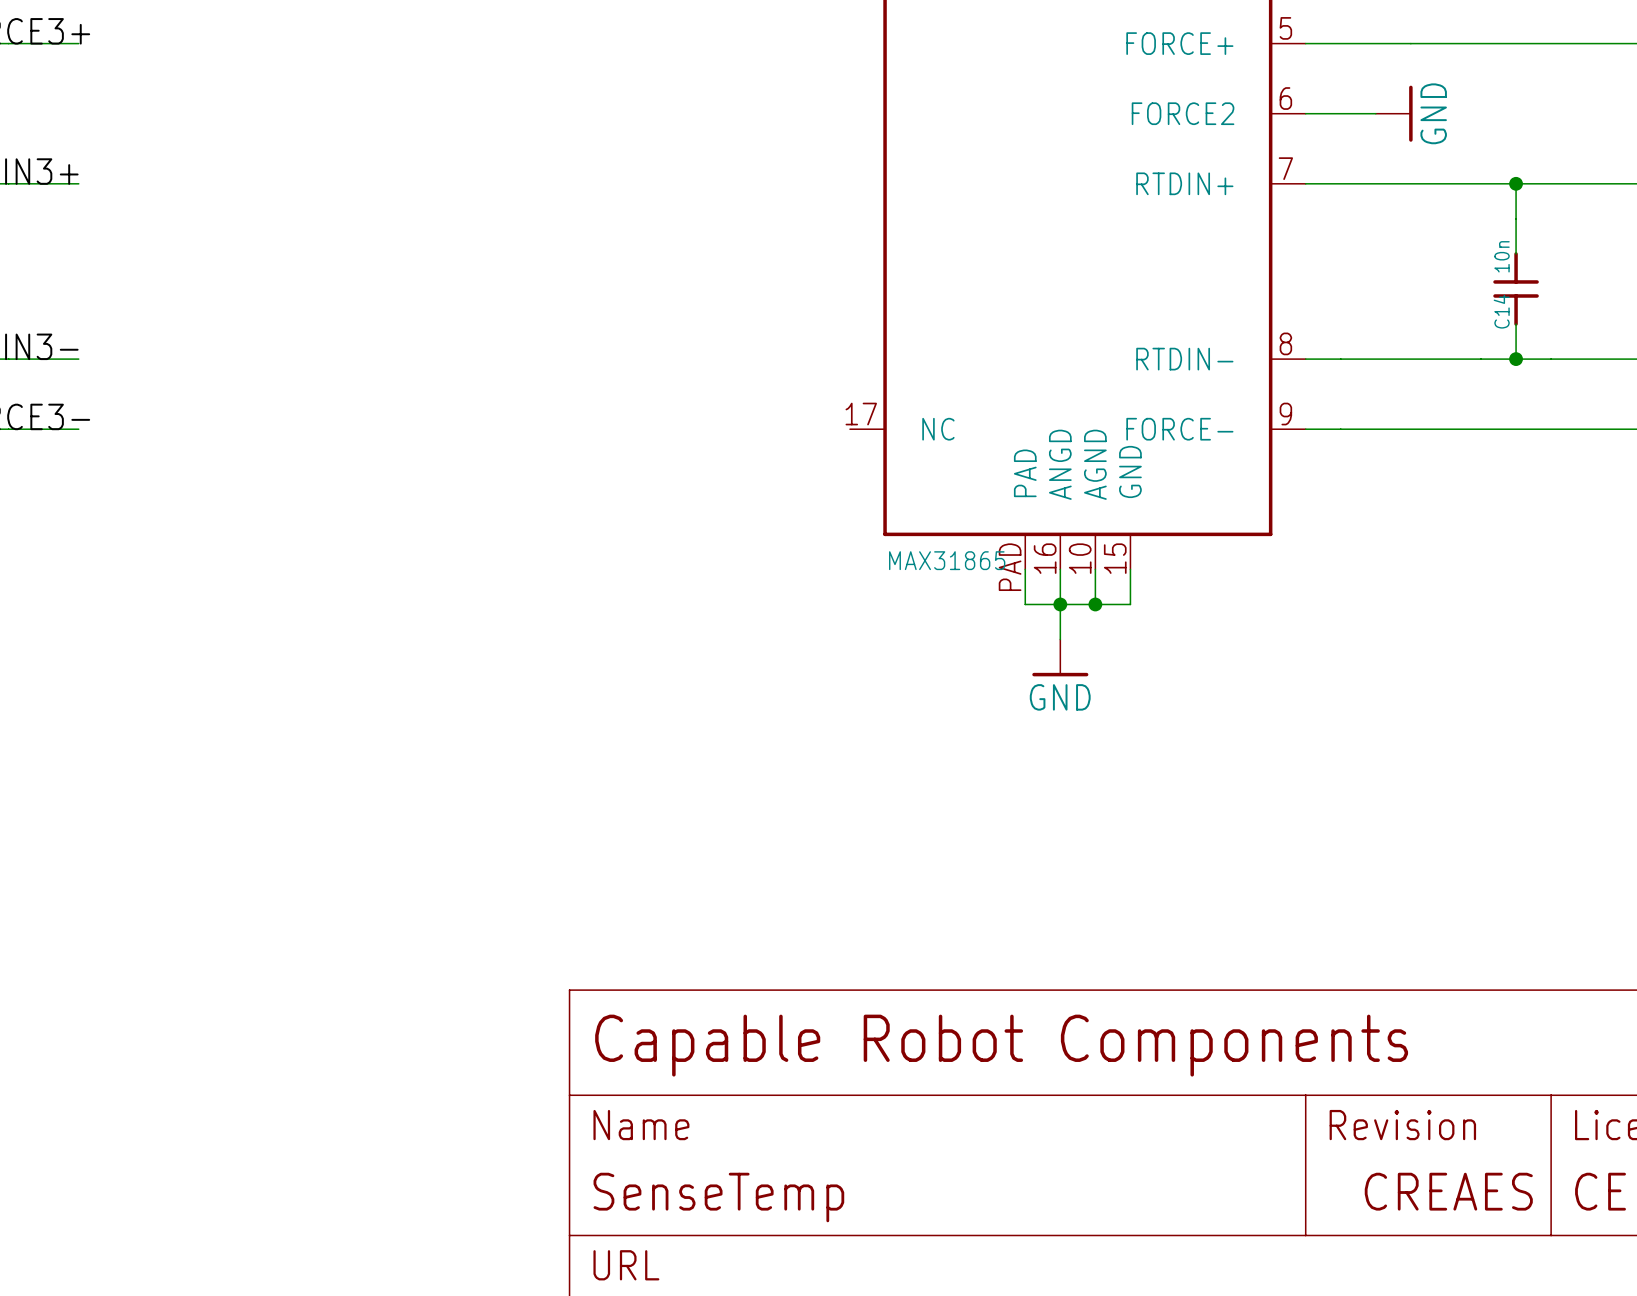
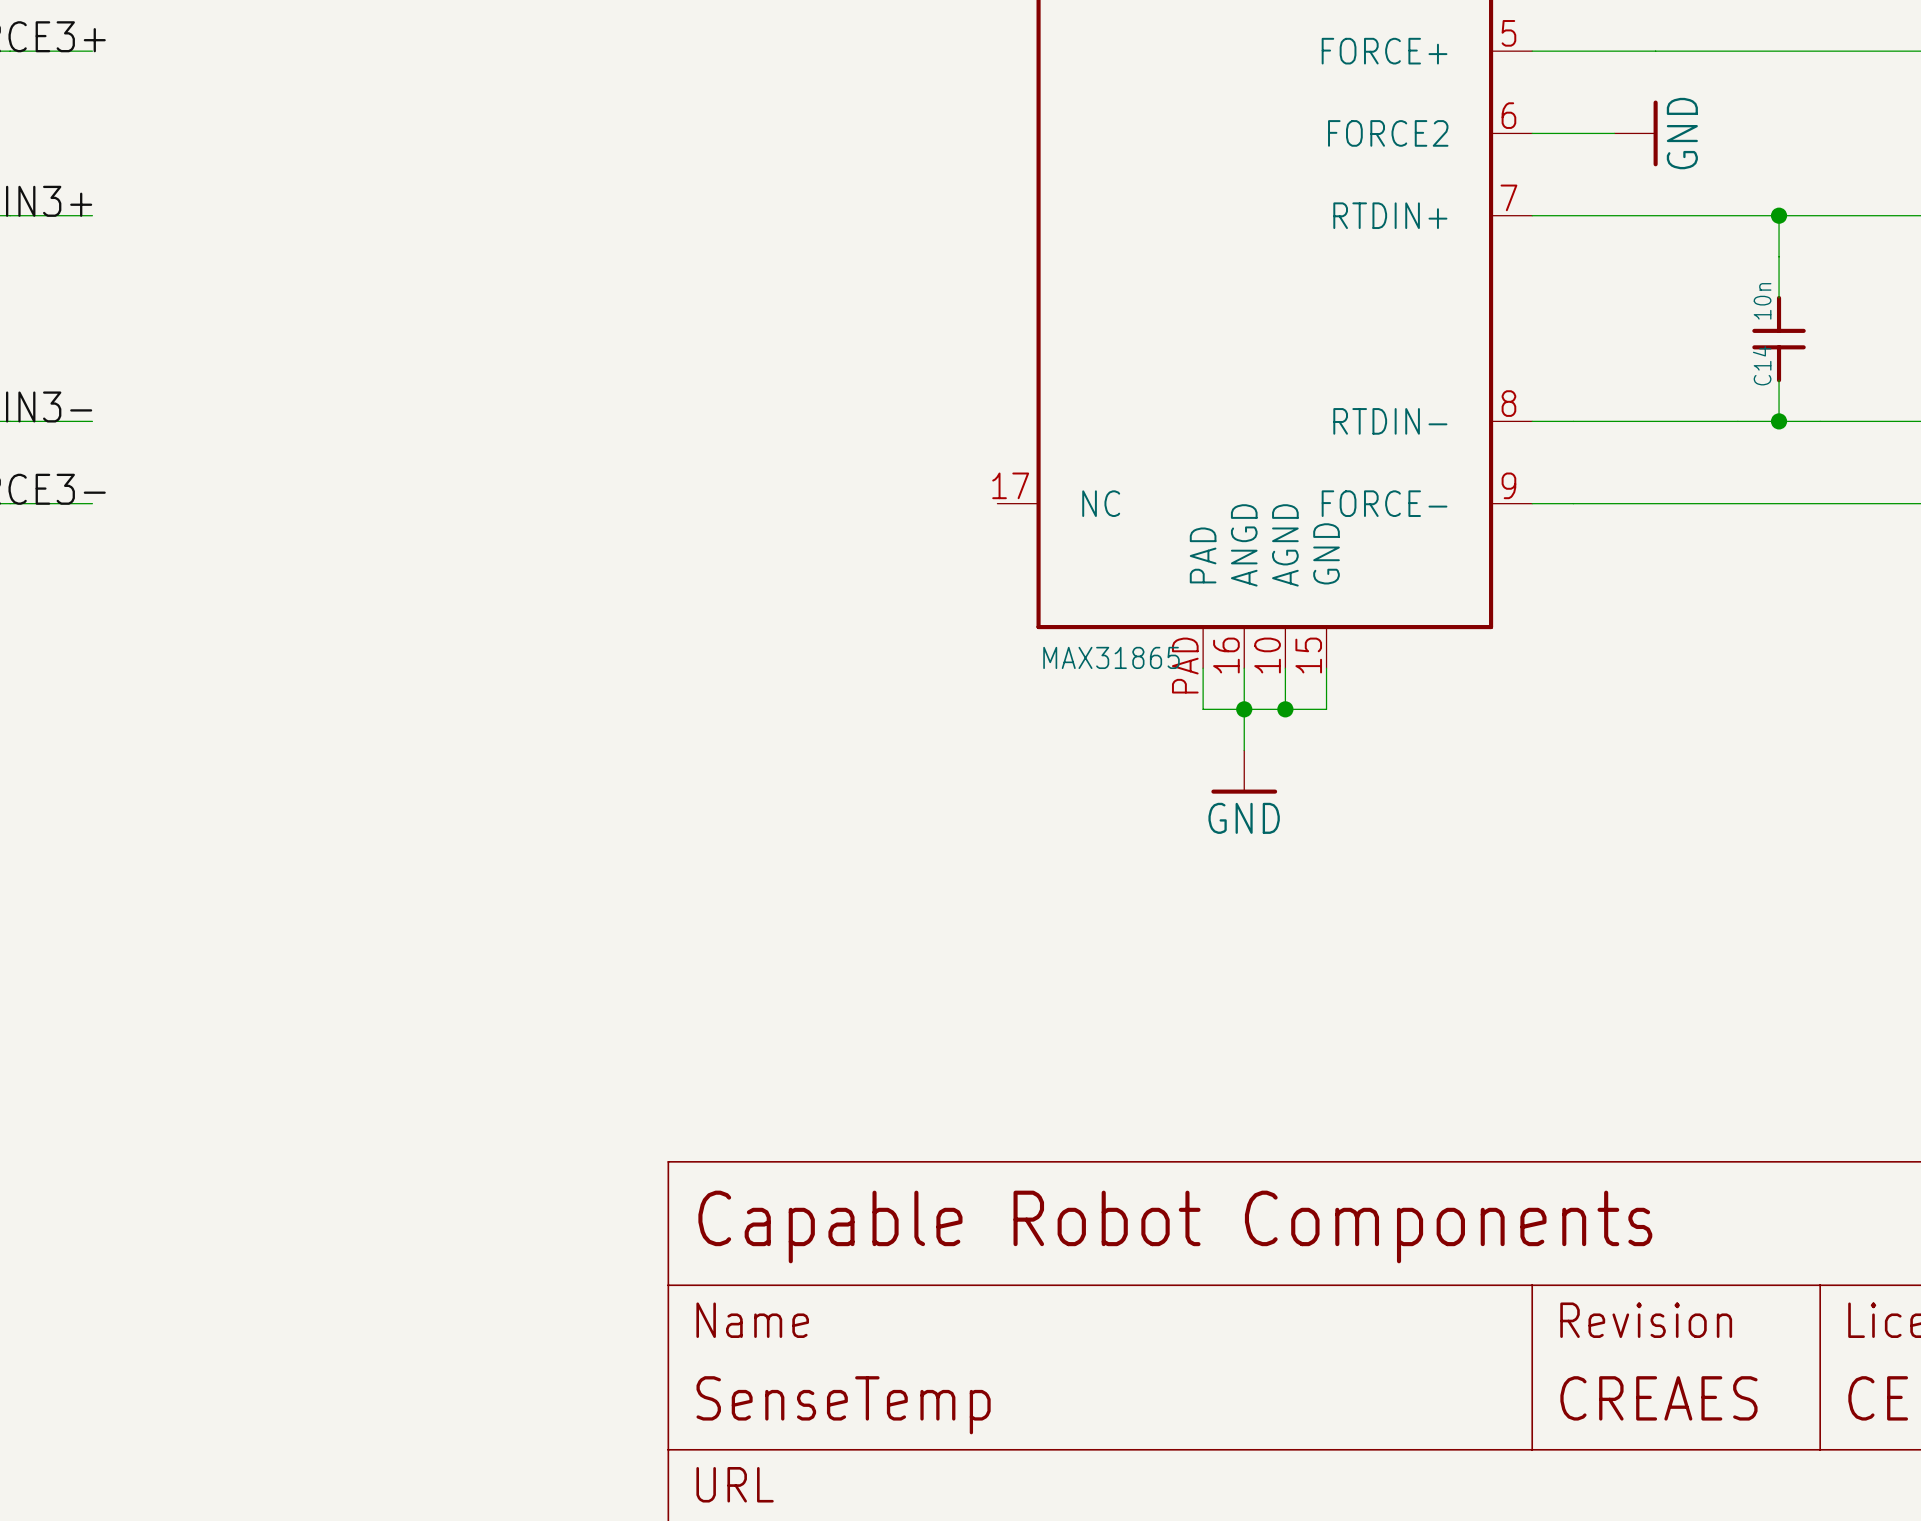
part text position: CREAES (1448, 1191) -> CREAES (1658, 1398)

